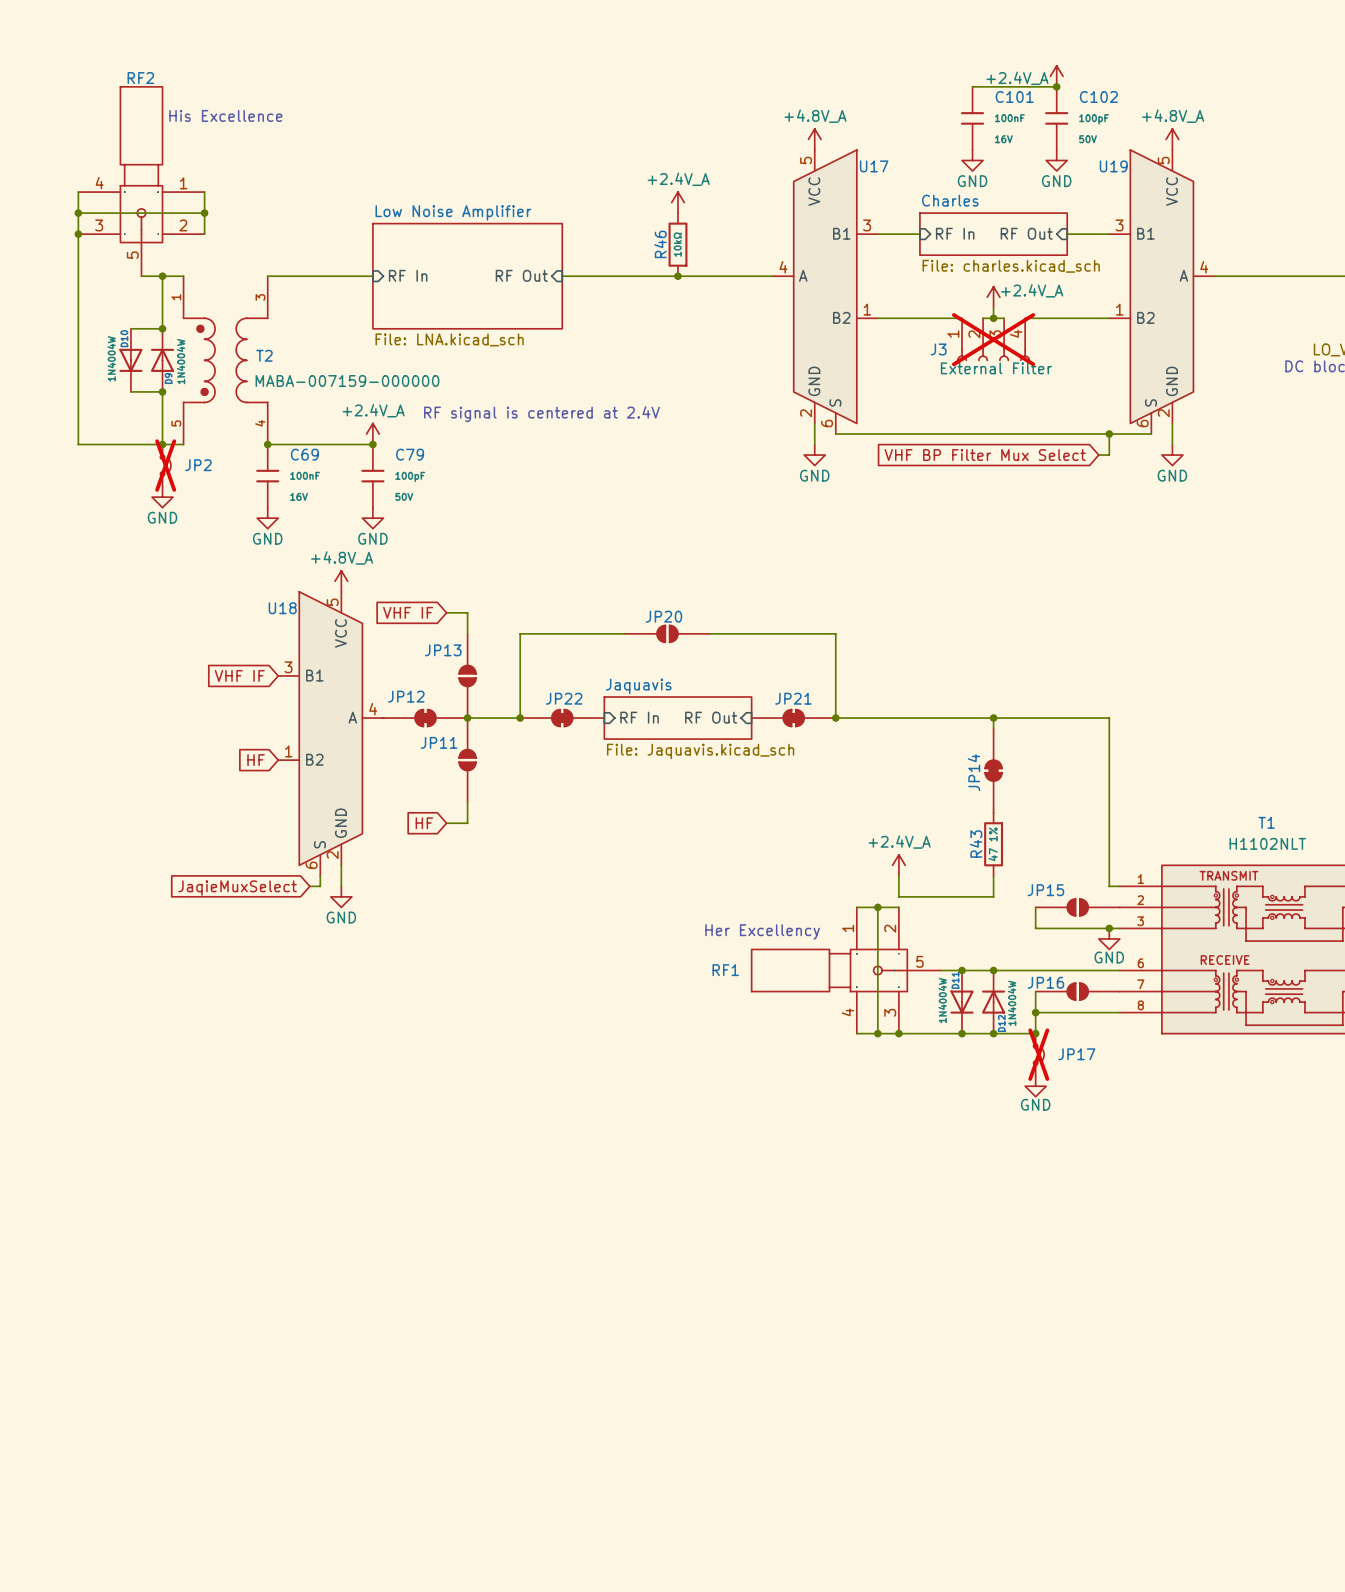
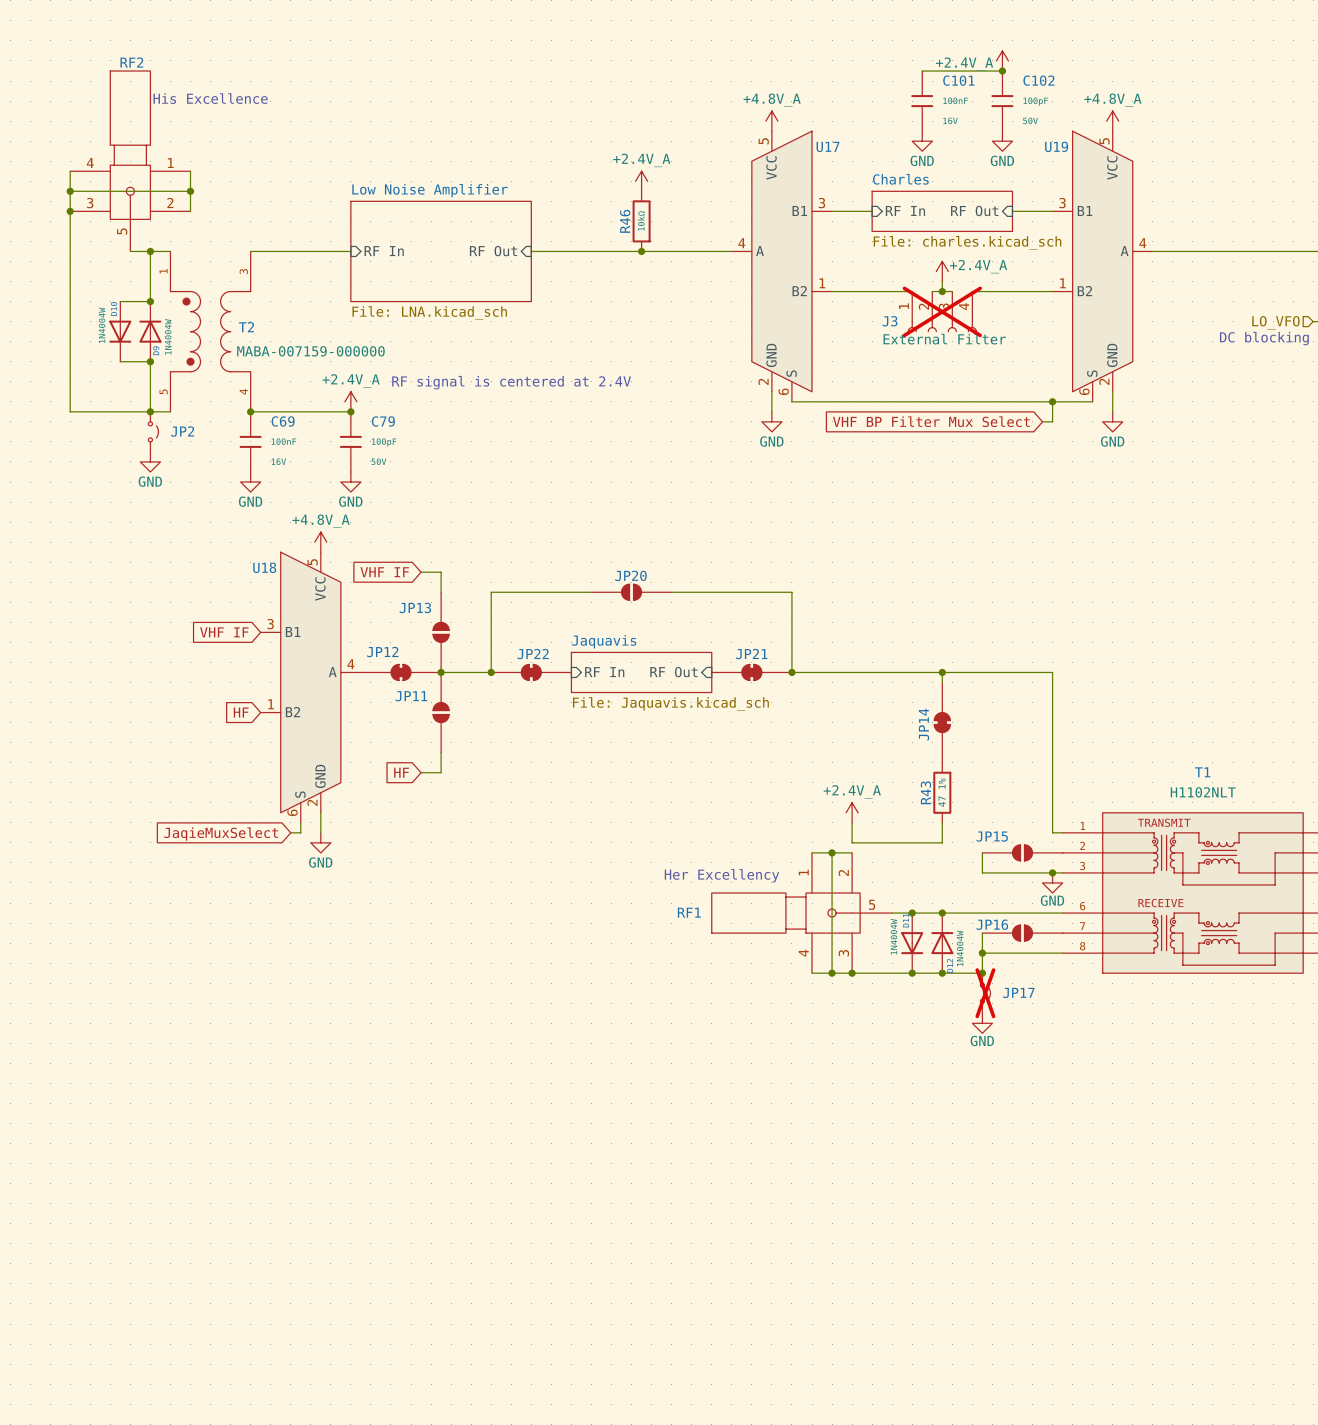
JP2 do-not-place cross: (165, 465) -> none

